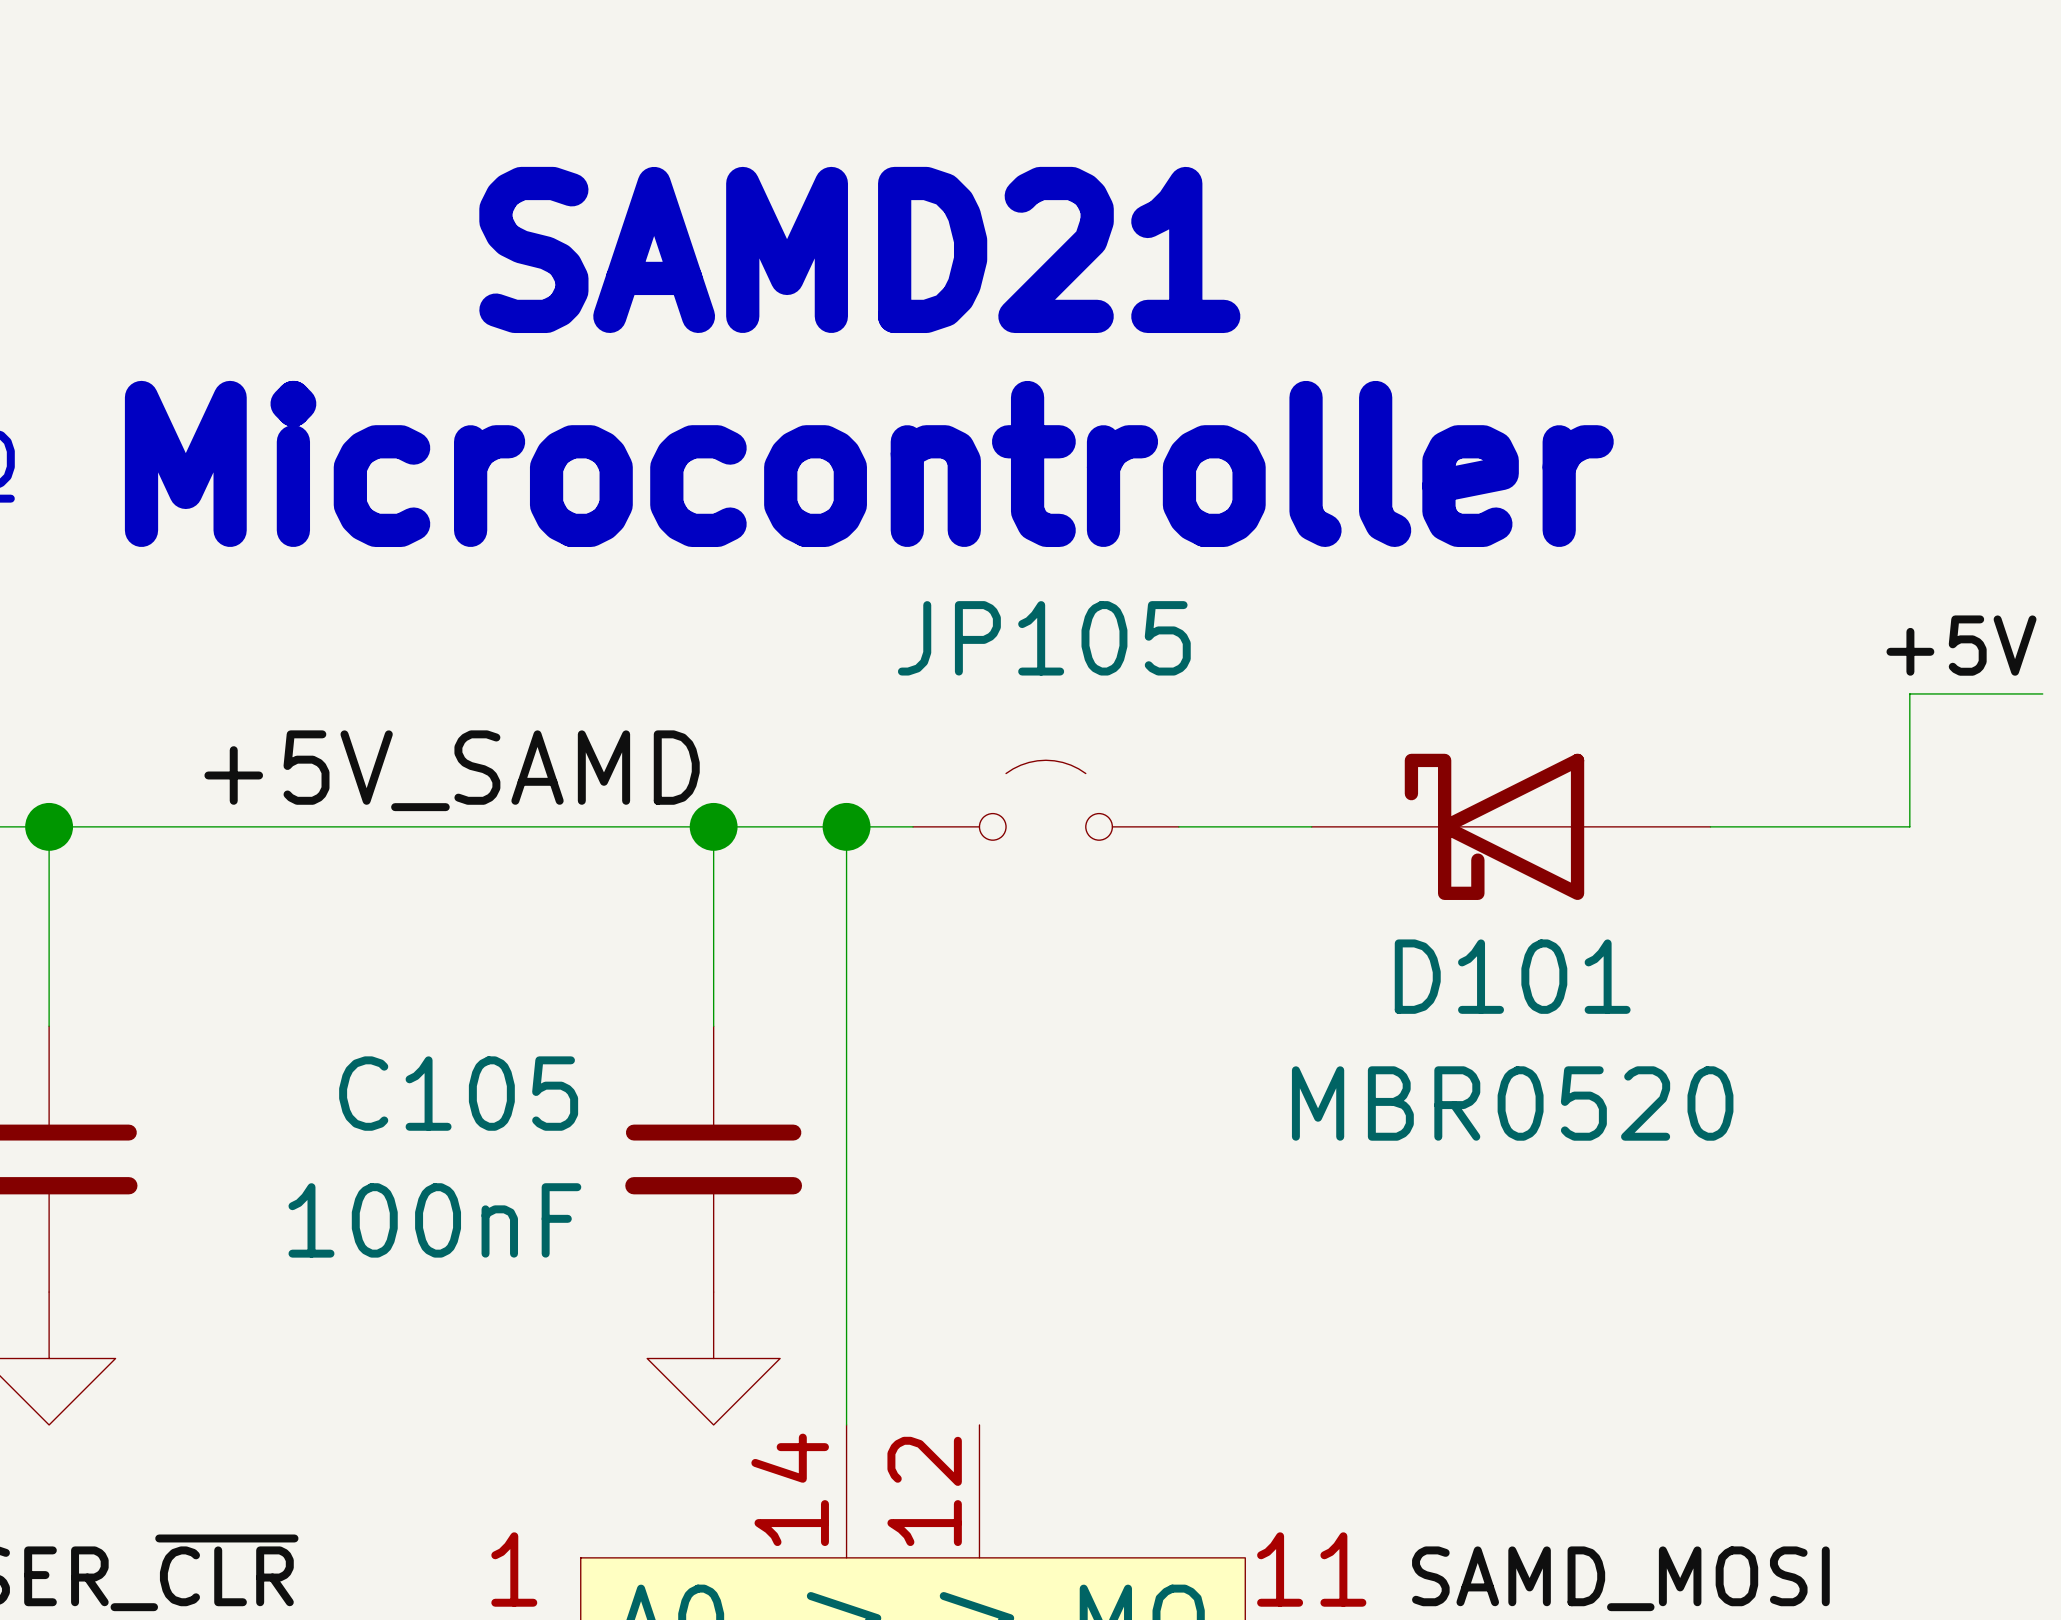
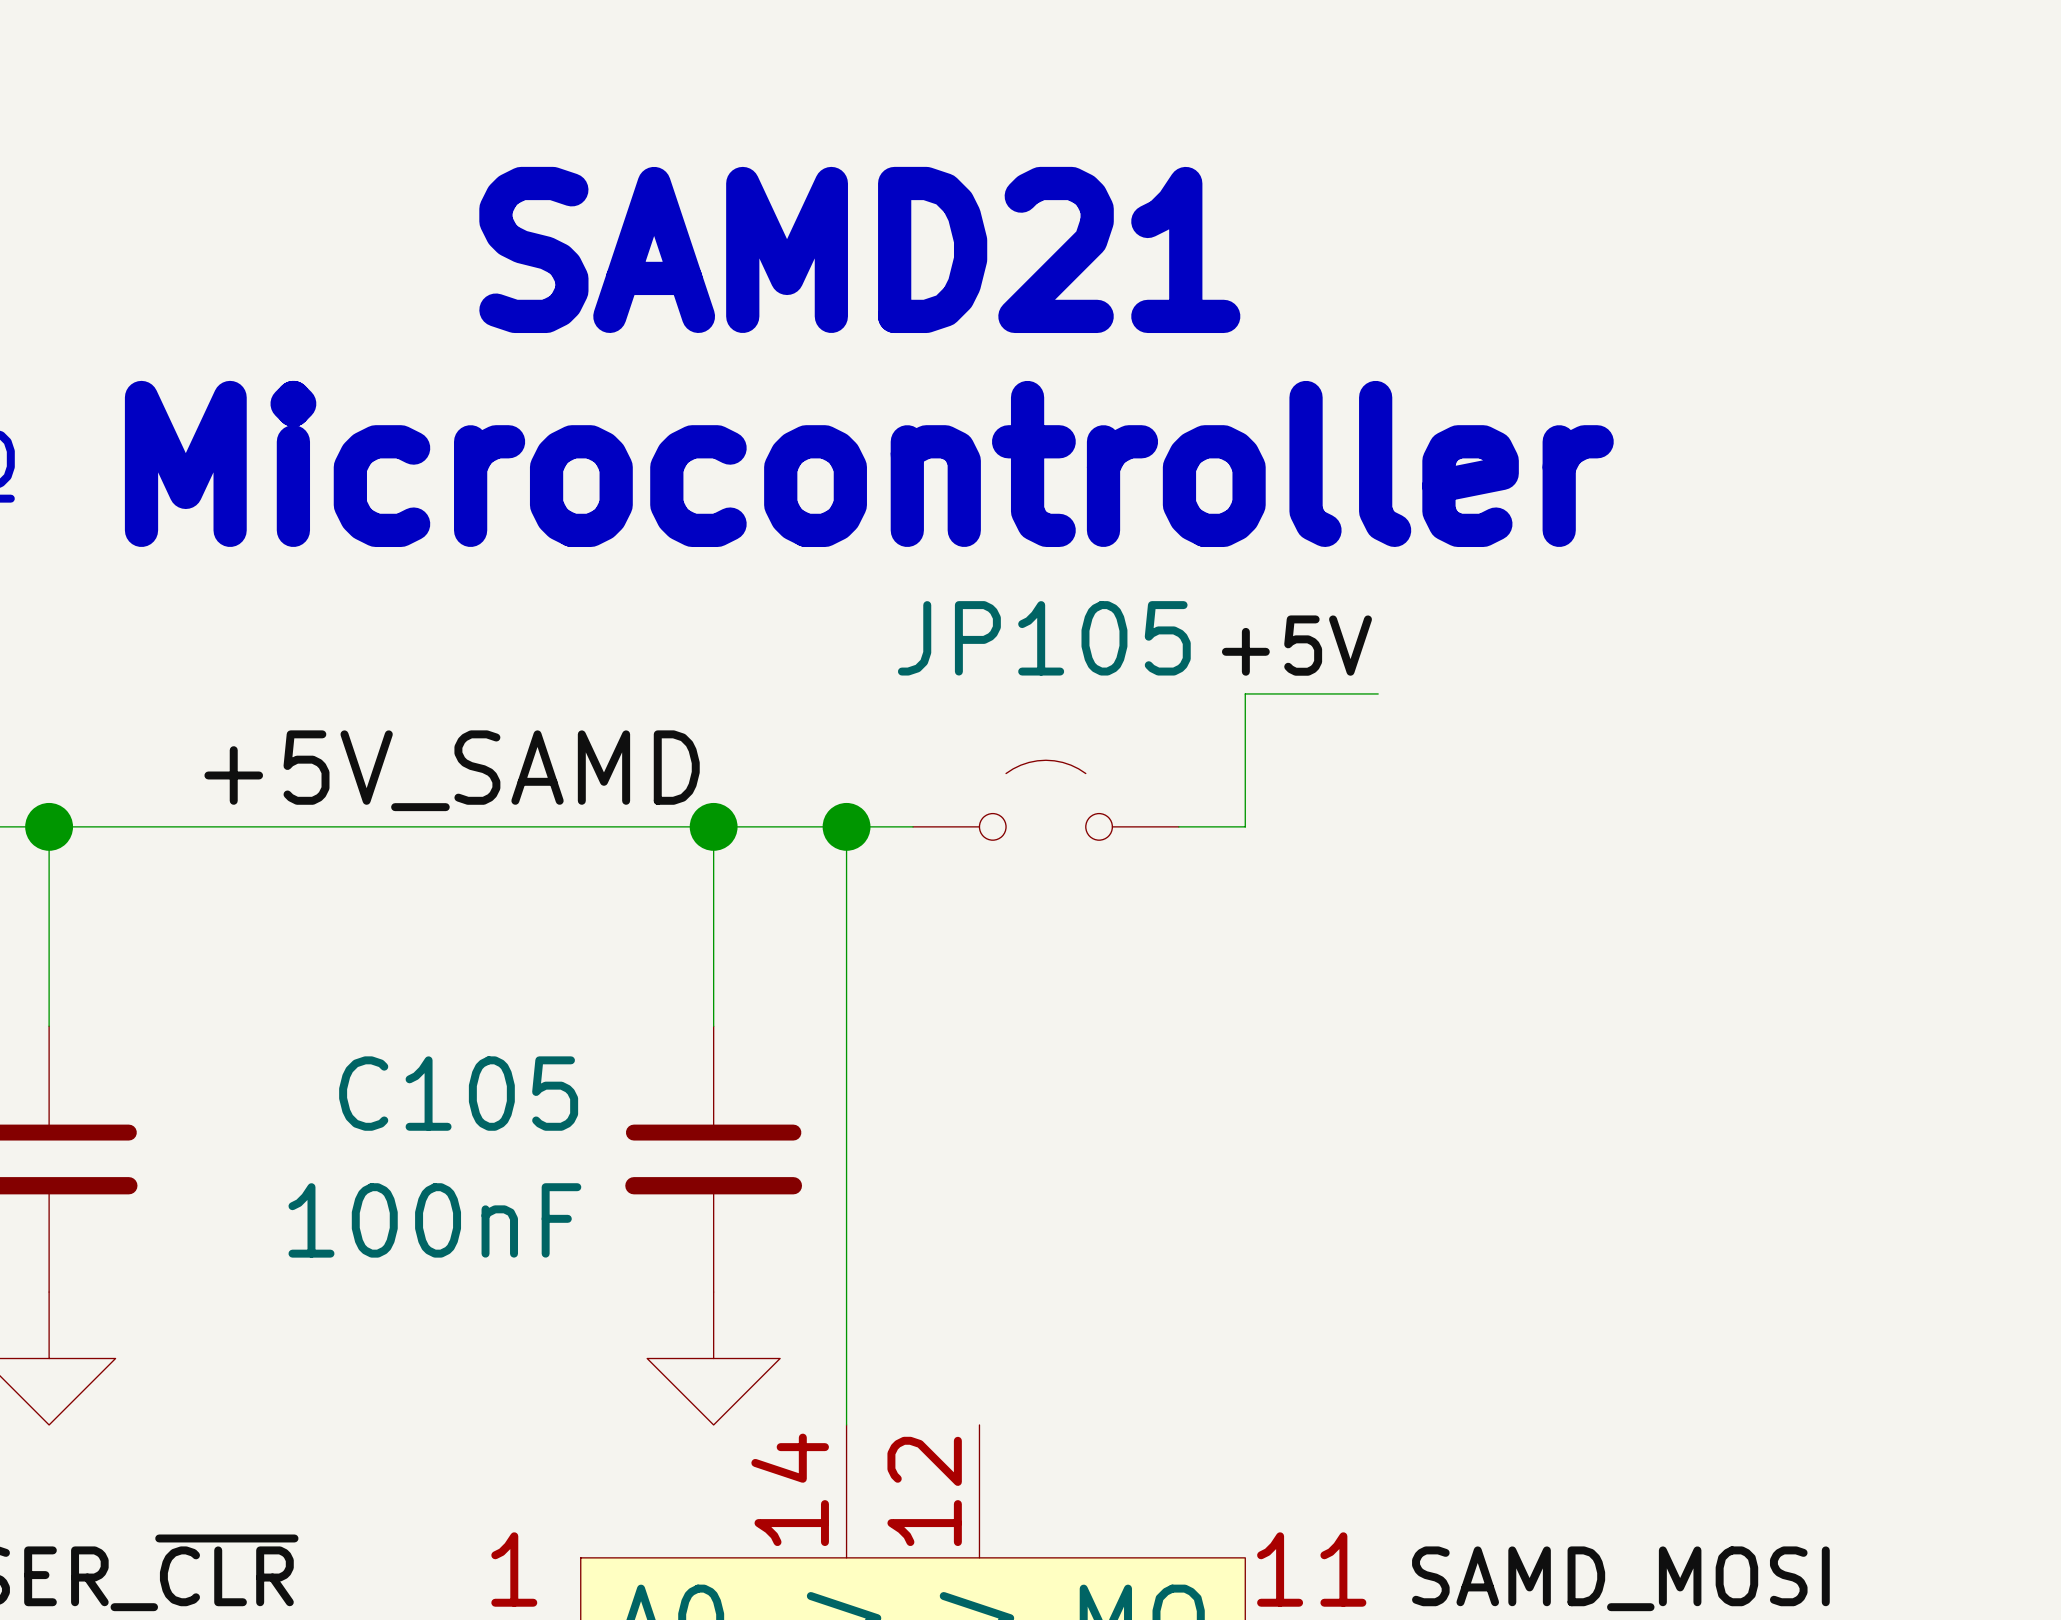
label position: +5V (1961, 645) -> +5V (1296, 645)
wire: (2042, 693) (1909, 693) (1909, 826) (1710, 826) -> none
wire: (1245, 826) (1311, 826) -> (1245, 826) (1245, 693) (1378, 693)
D101: MBR0520 (1511, 826) -> none

